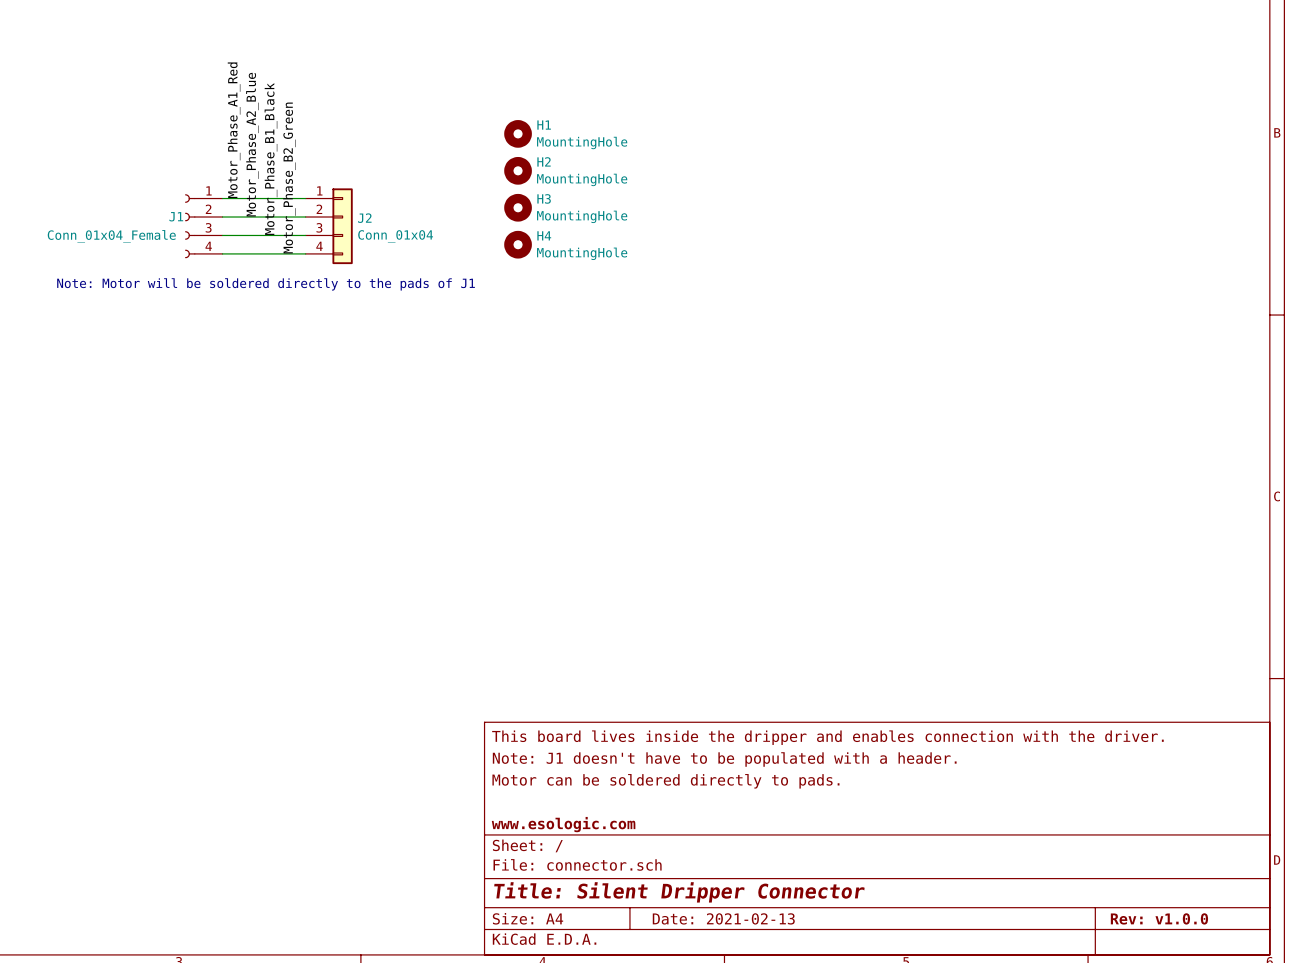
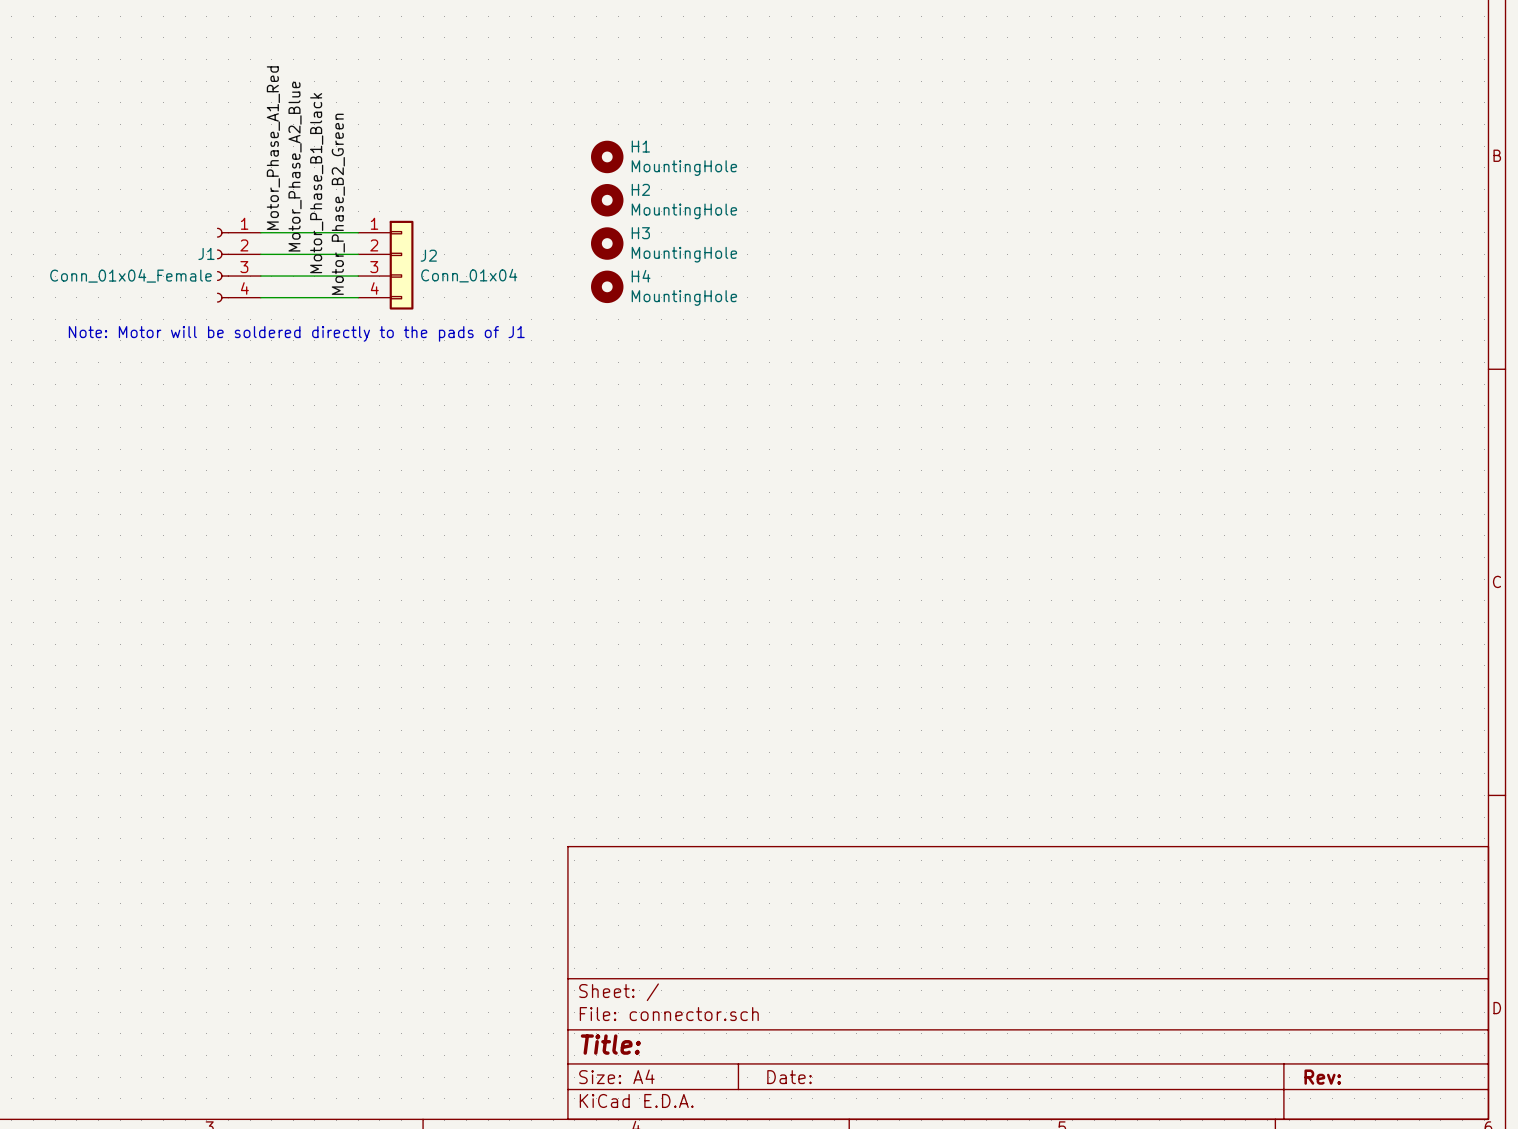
title block: This board lives inside the dripper and enables connection with the driver. (827, 737) -> none
title block: Note: J1 doesn't have to be populated with a header. (724, 759) -> none
title block: Motor can be soldered directly to pads. (665, 781) -> none
title block: www.esologic.com (563, 824) -> none
title block: Title: Silent Dripper Connector (679, 892) -> Title: (610, 1044)
title block: Date: 2021-02-13 (723, 918) -> Date: (789, 1077)
title block: Rev: v1.0.0 (1159, 918) -> Rev: (1322, 1077)

